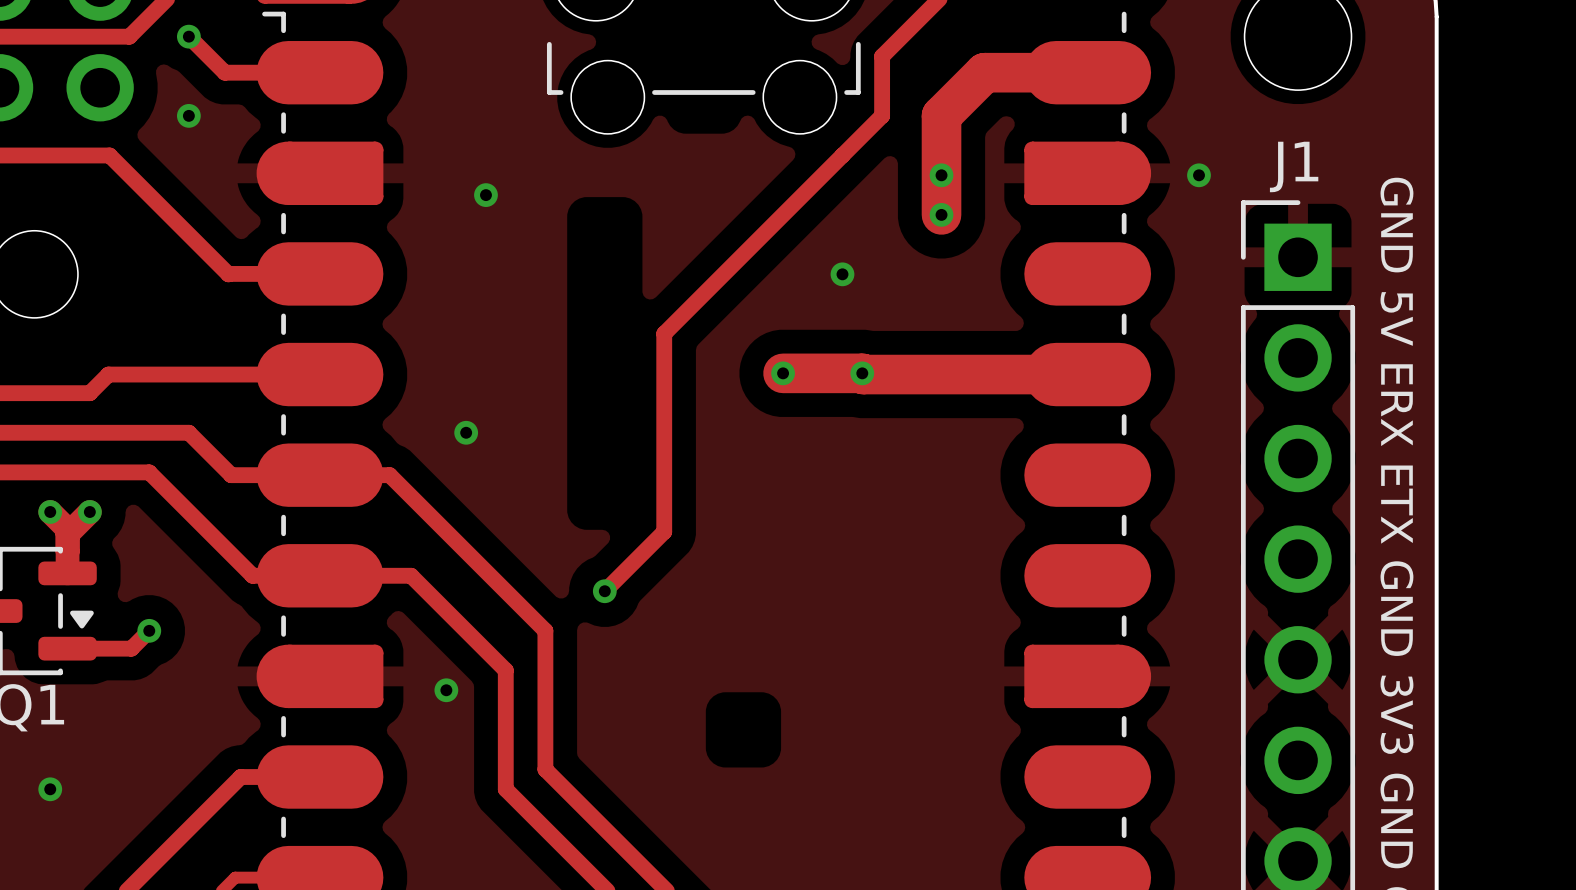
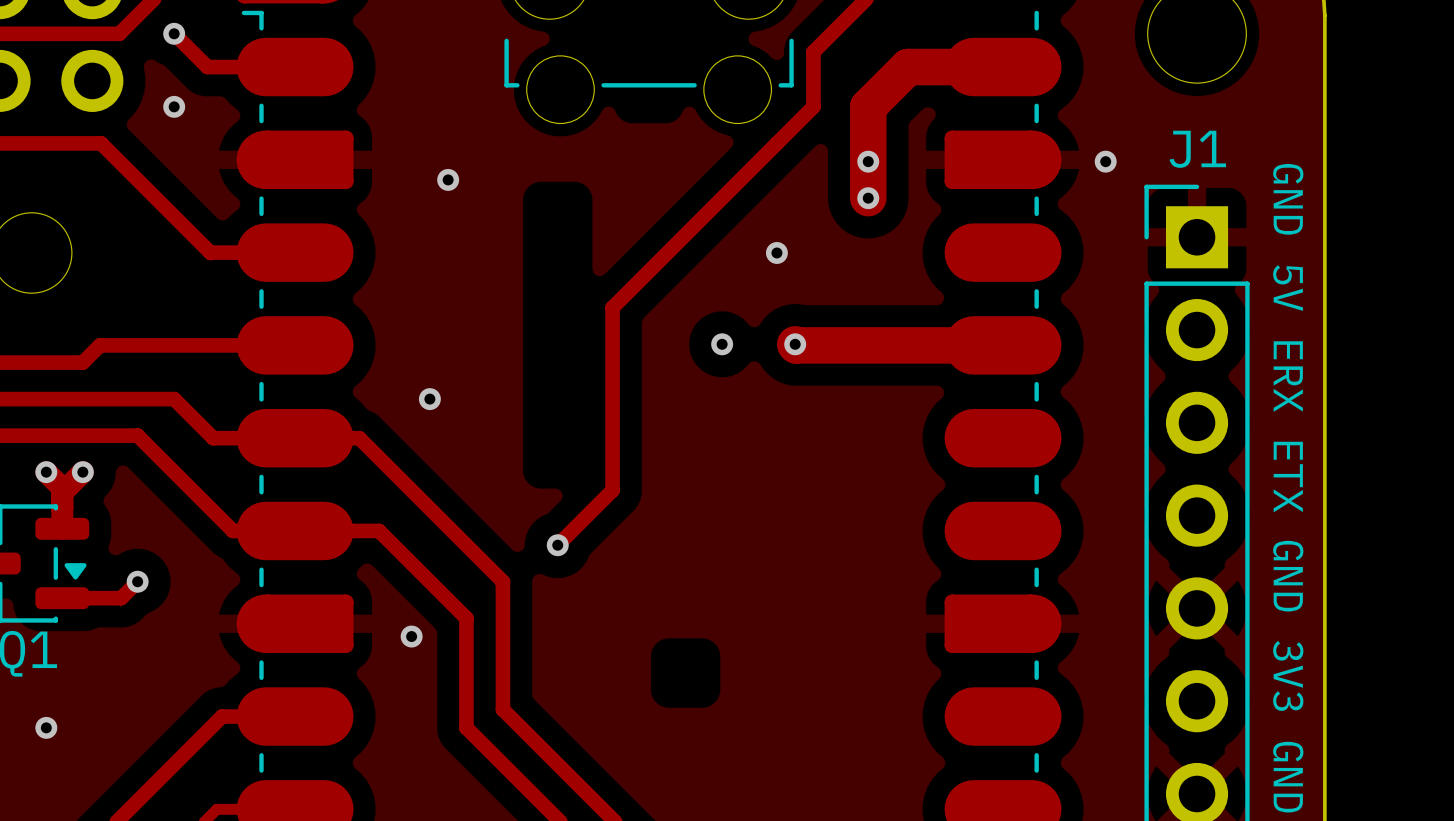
track: (783, 373) (862, 373) -> none

